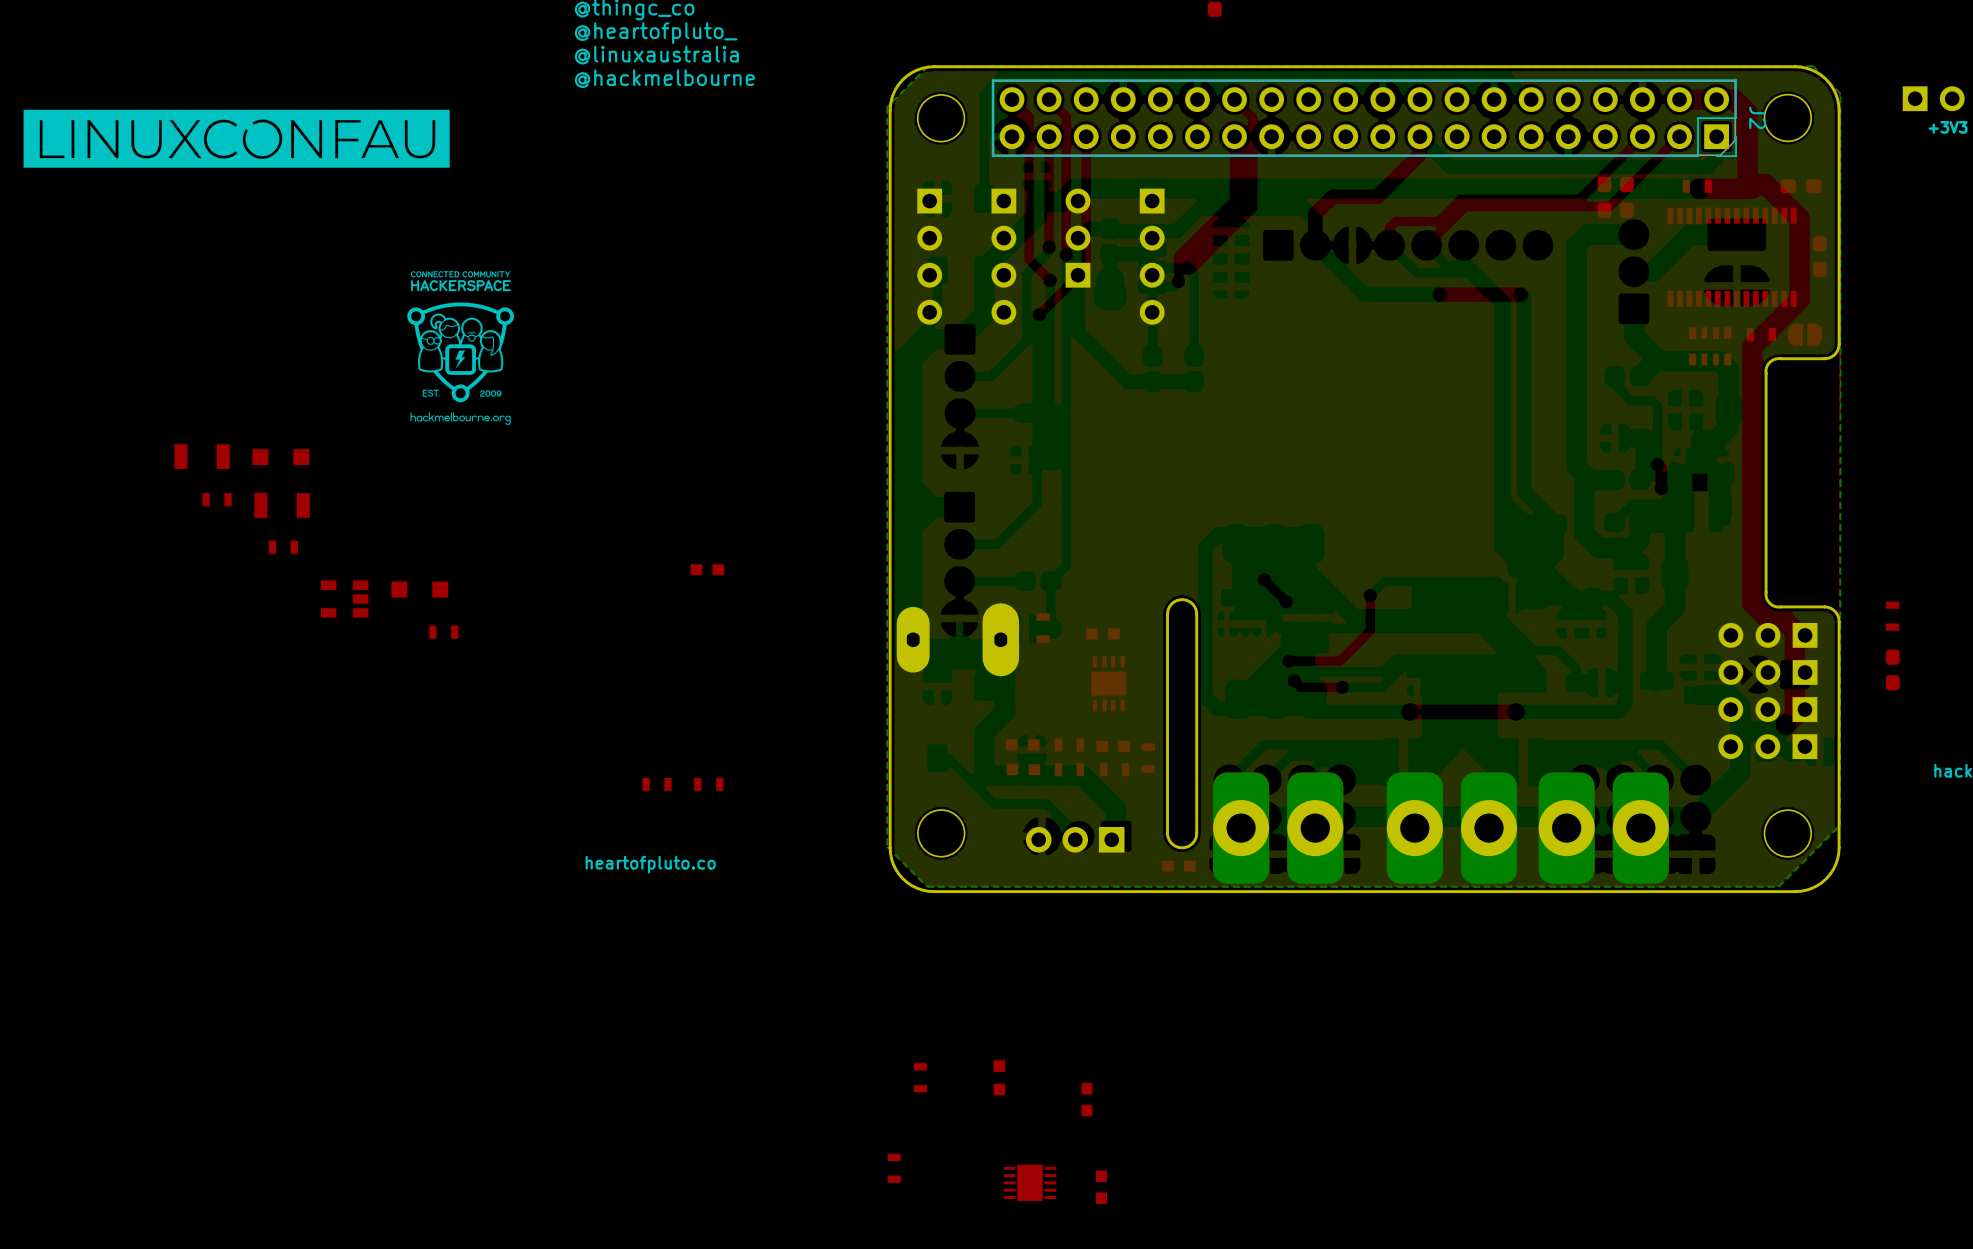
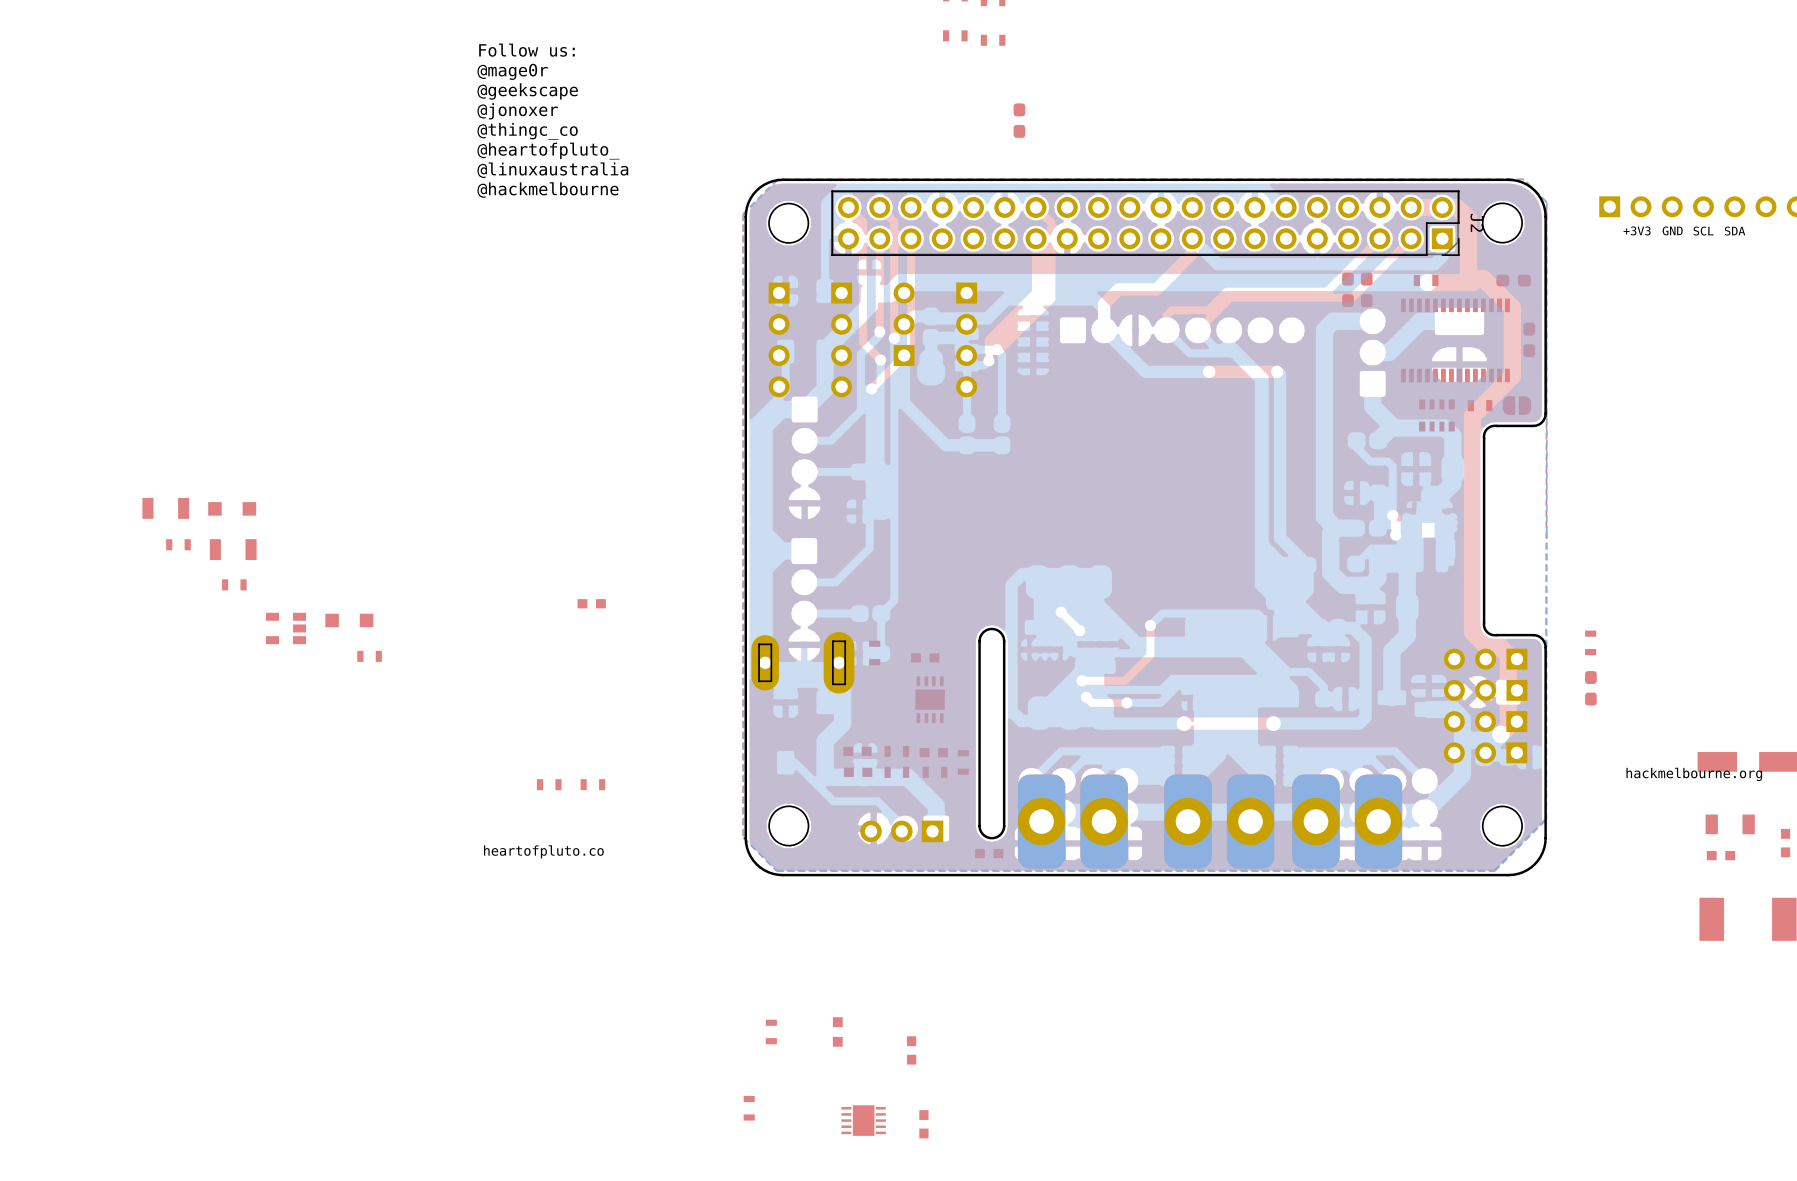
drawing: [23, 109, 450, 168] -> none
drawing: [407, 271, 514, 426] -> none

